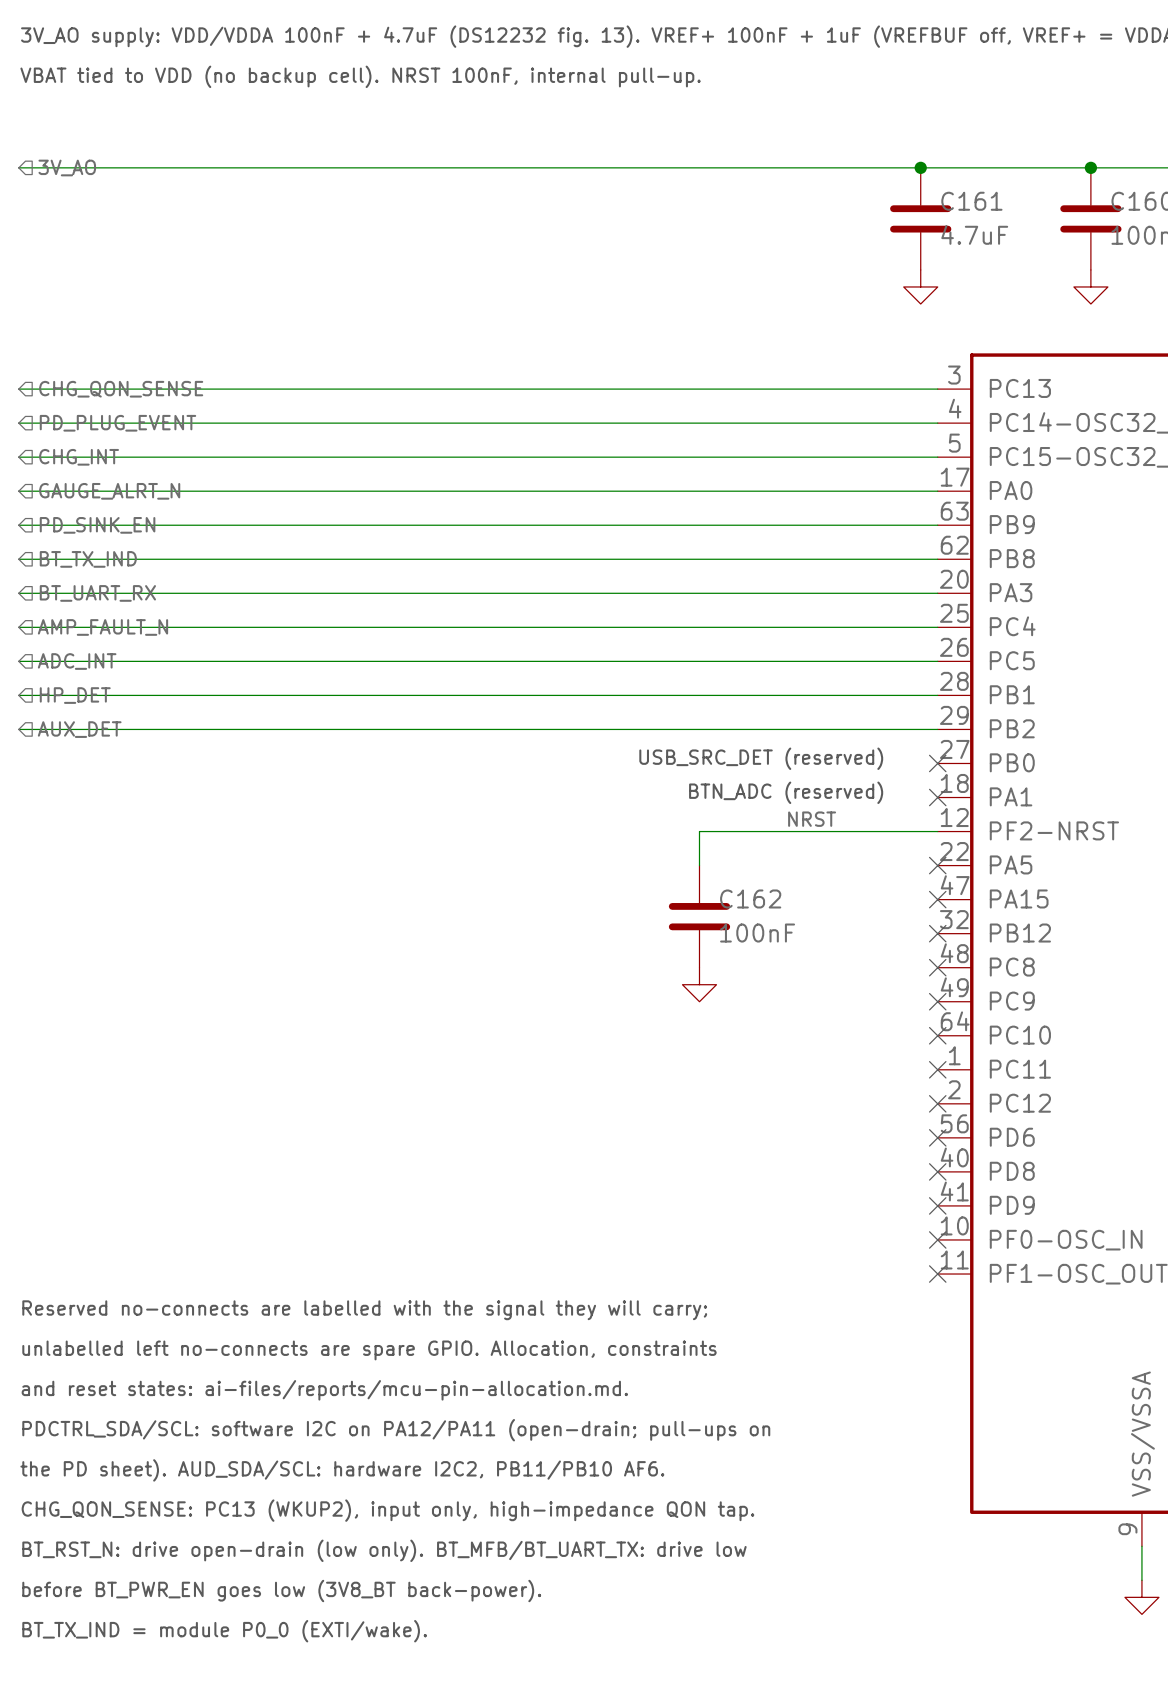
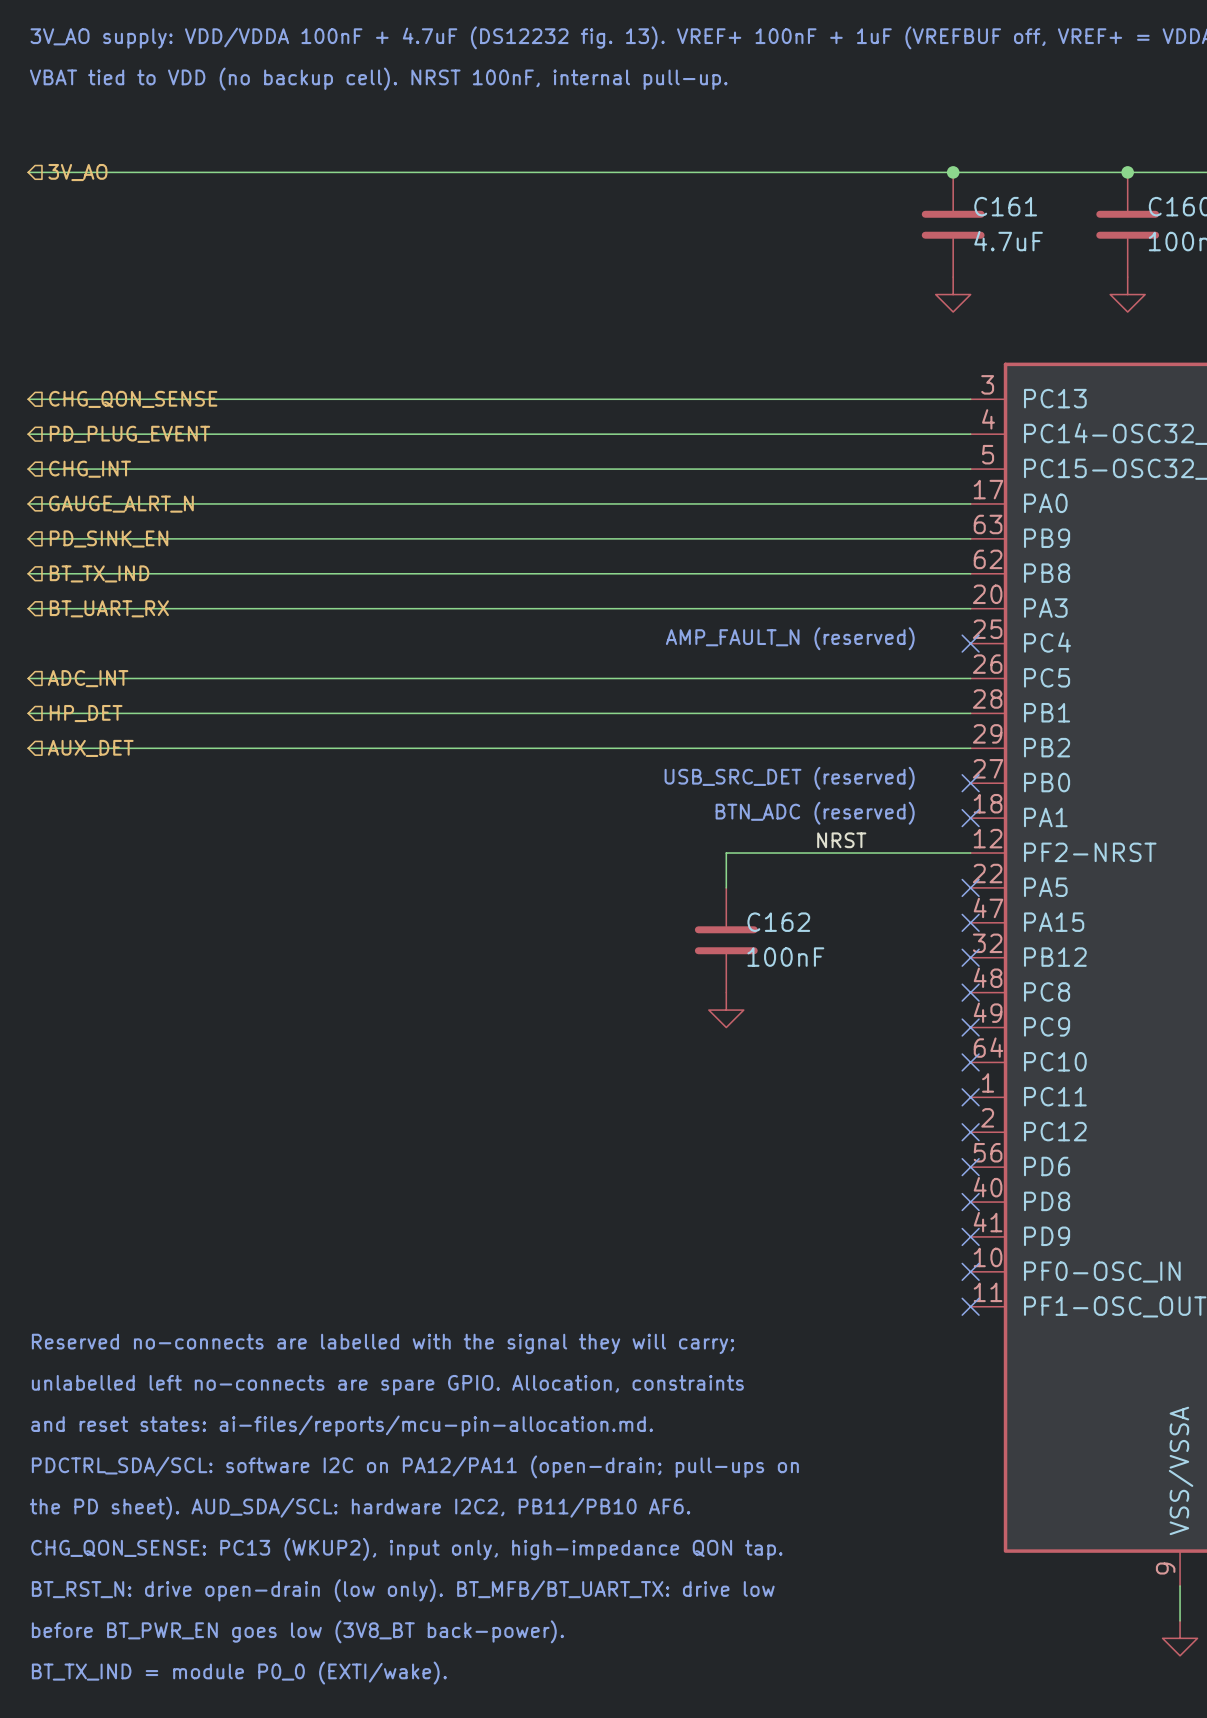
text: none -> AMP_FAULT_N (reserved) (790, 638)
wire: (18, 627) (937, 627) -> none
hierarchical label: AMP_FAULT_N (102, 627) -> none
no-connect mark: none -> (970, 643)

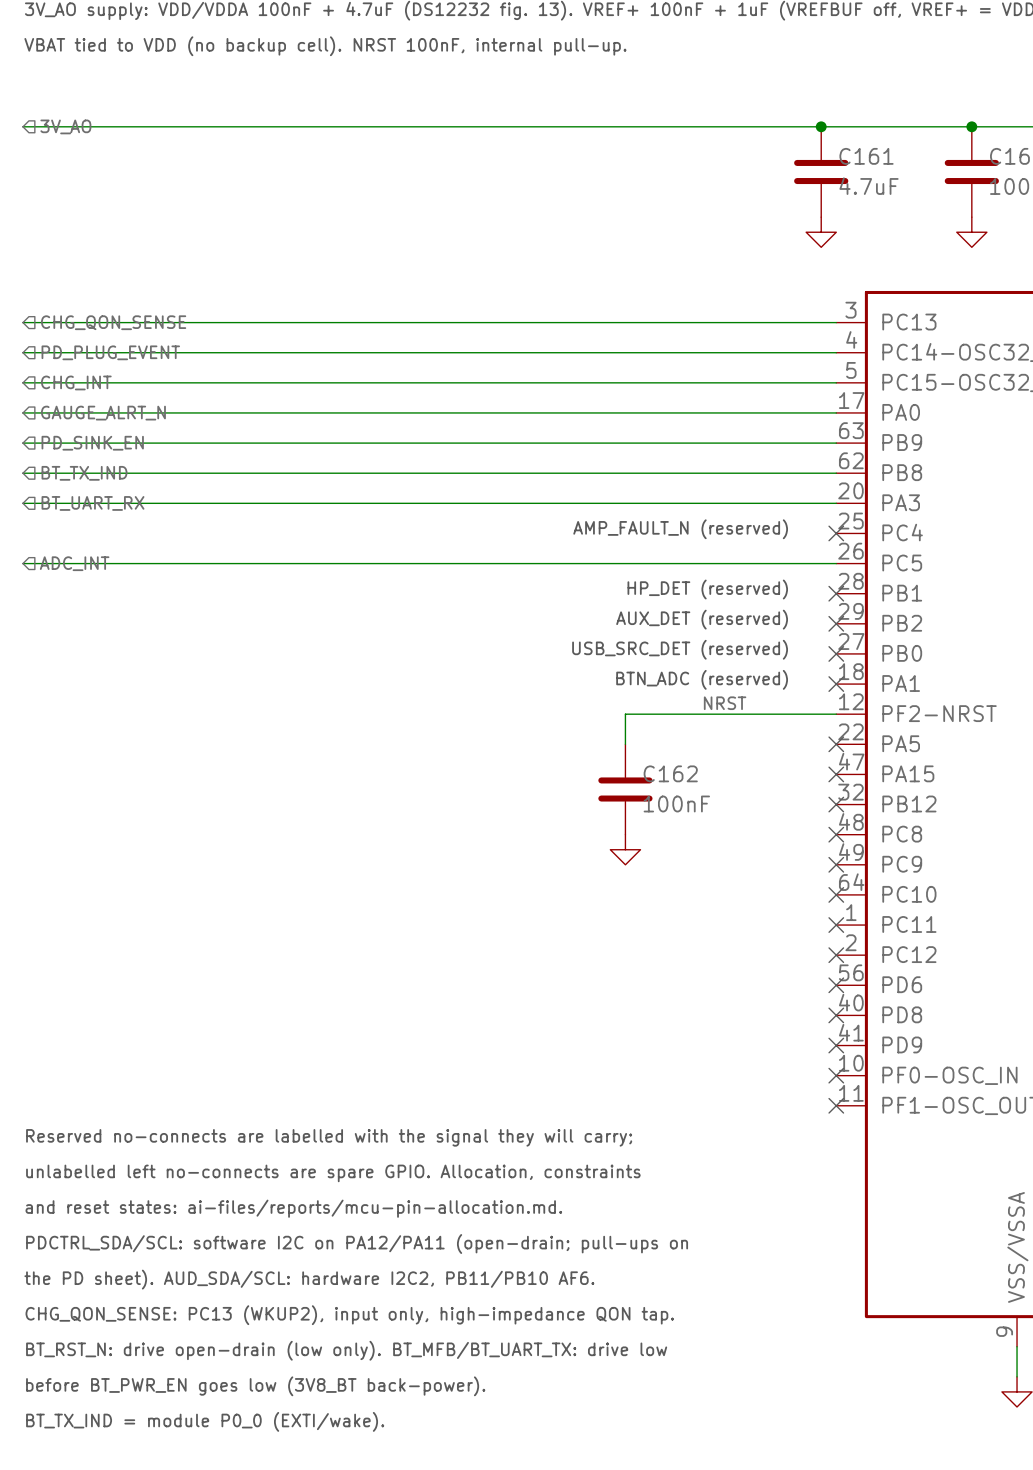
text: none -> HP_DET (reserved) (707, 589)
wire: (28, 713) (970, 713) -> none
hierarchical label: HP_DET (86, 713) -> none
no-connect mark: none -> (836, 593)
text: none -> AUX_DET (reserved) (702, 619)
wire: (28, 748) (970, 748) -> none
hierarchical label: AUX_DET (90, 748) -> none
no-connect mark: none -> (836, 623)

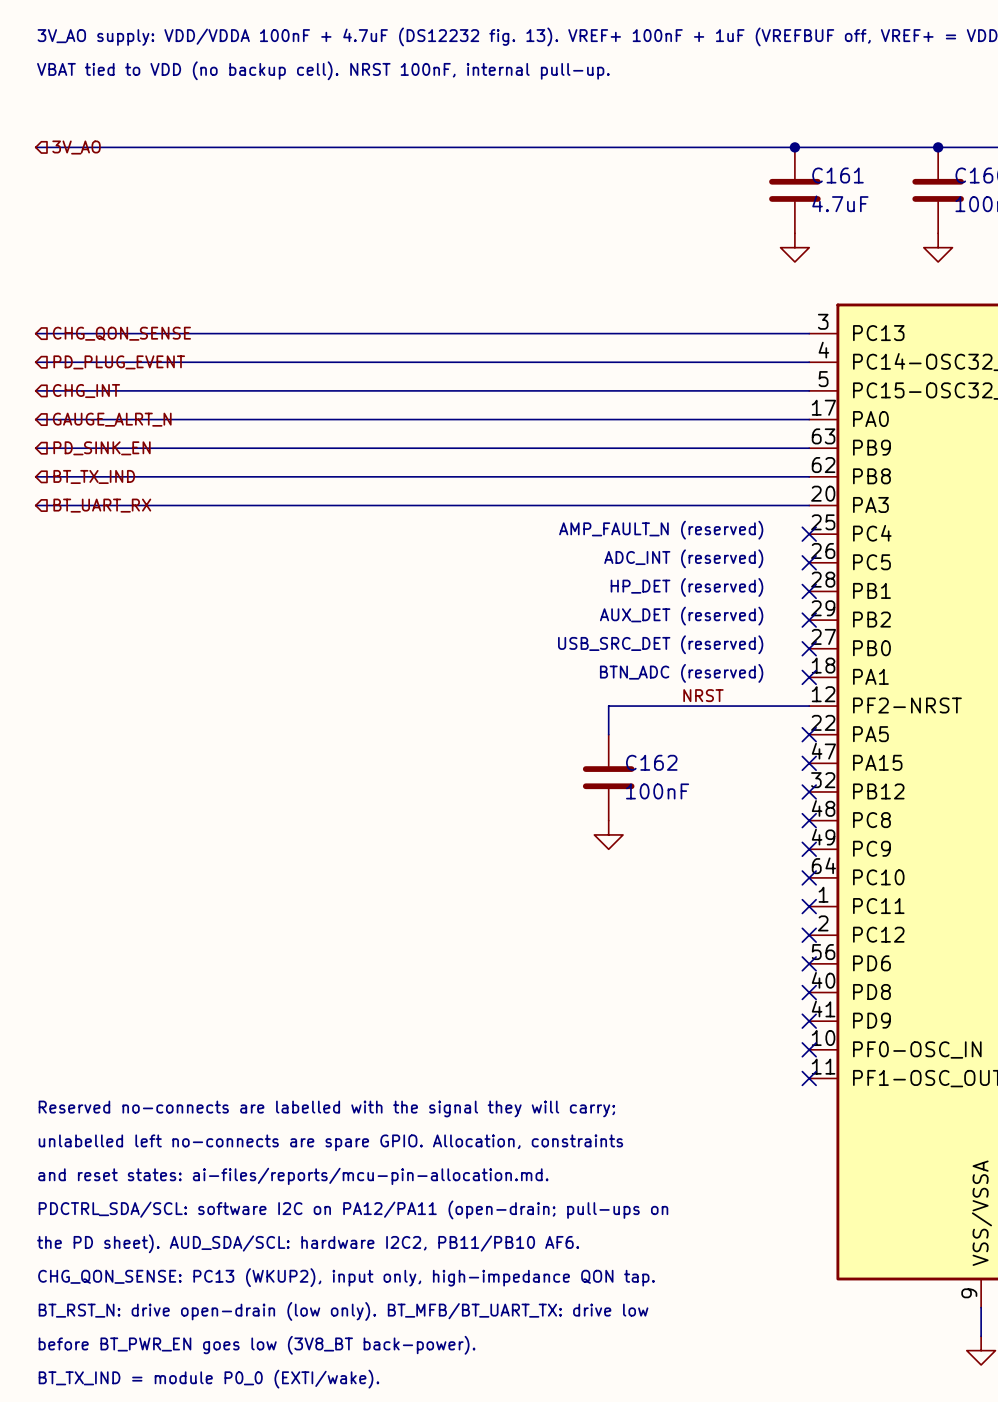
text: none -> ADC_INT (reserved) (683, 558)
wire: (22, 563) (836, 563) -> none
hierarchical label: ADC_INT (74, 563) -> none
no-connect mark: none -> (809, 562)

